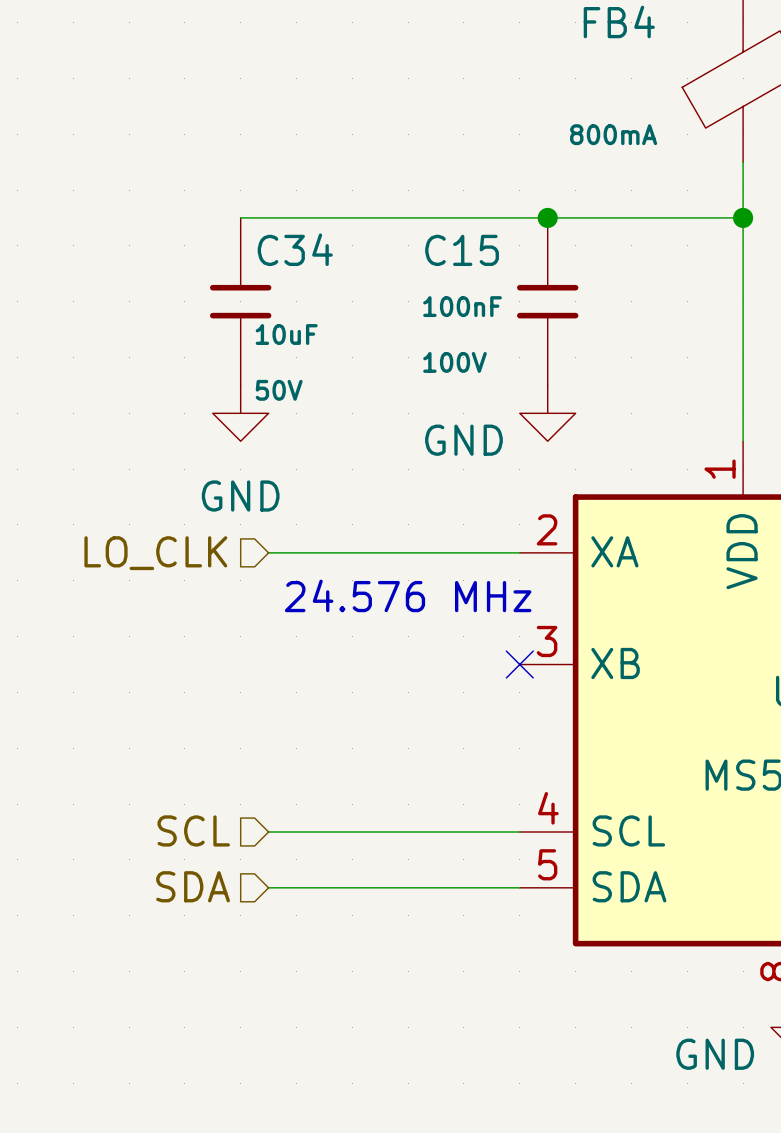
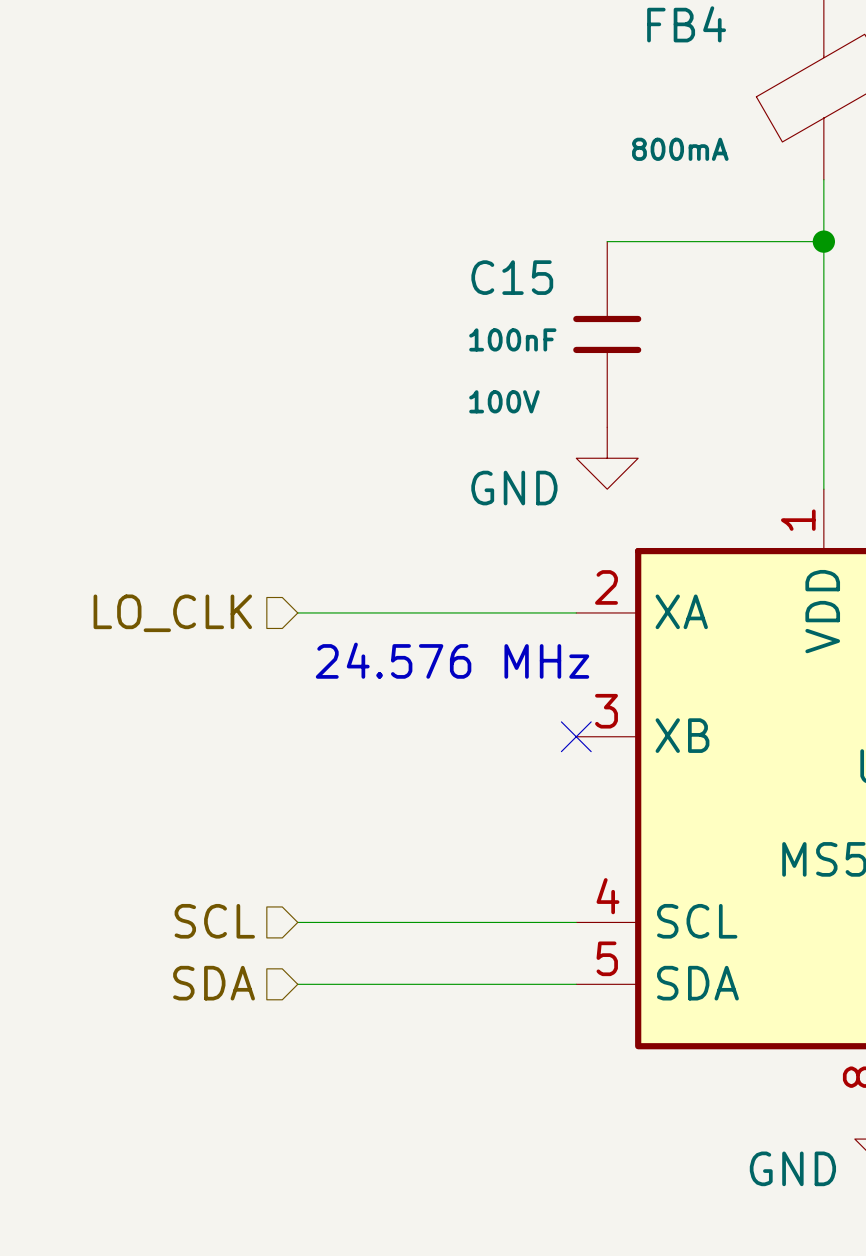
wire: (240, 217) (547, 217) -> none
junction: (547, 217) -> none
C34: 10uF (240, 301) -> none
power symbol: GND (240, 413) -> none

